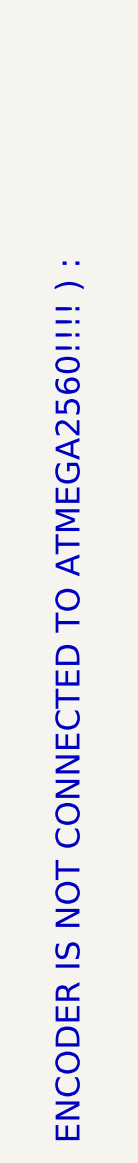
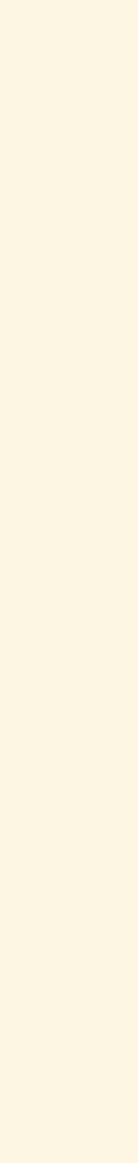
text: ENCODER IS NOT CONNECTED TO ATMEGA2560!!!! ) : (69, 700) -> none

